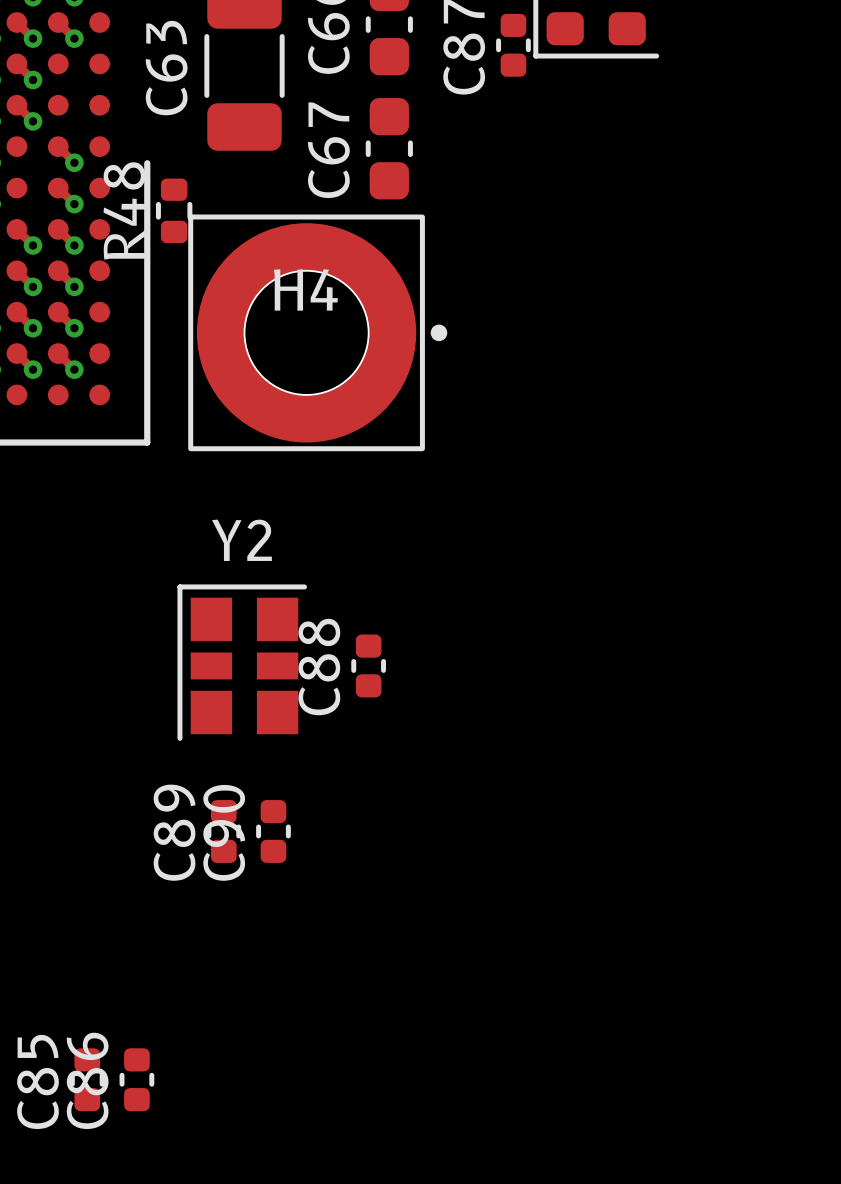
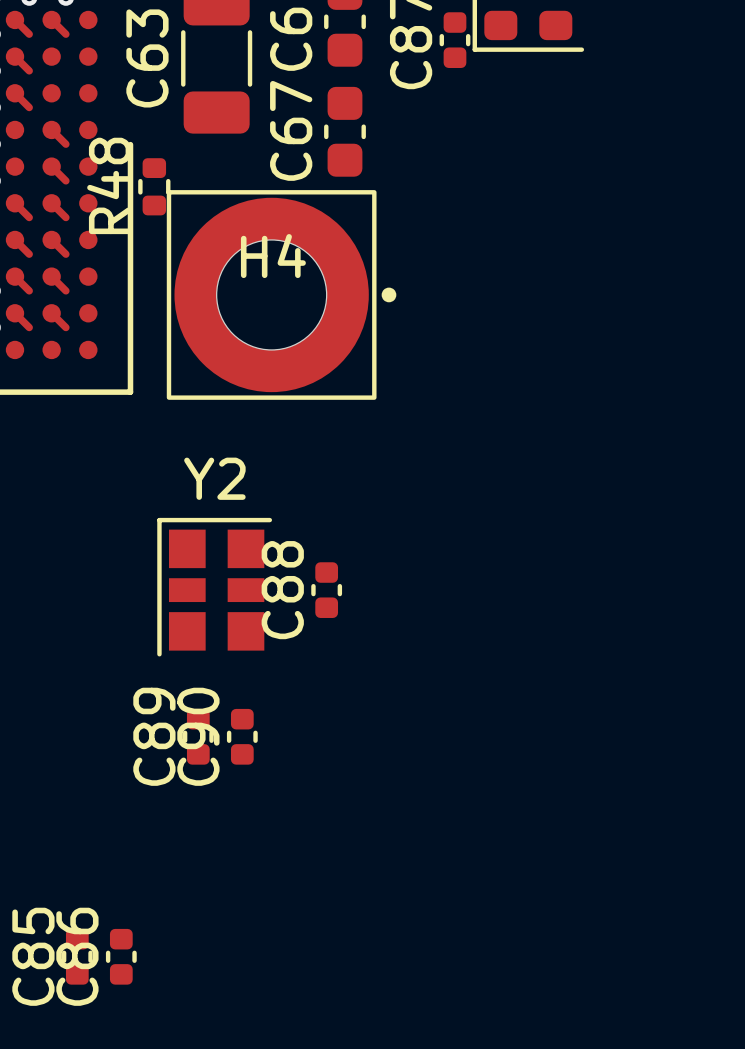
via: (33, 38) -> none
via: (74, 38) -> none
via: (33, 80) -> none
via: (33, 121) -> none
via: (74, 162) -> none
via: (74, 204) -> none
via: (33, 245) -> none
via: (74, 245) -> none
via: (33, 286) -> none
via: (74, 286) -> none
via: (33, 328) -> none
via: (74, 328) -> none
via: (33, 369) -> none
via: (74, 369) -> none

